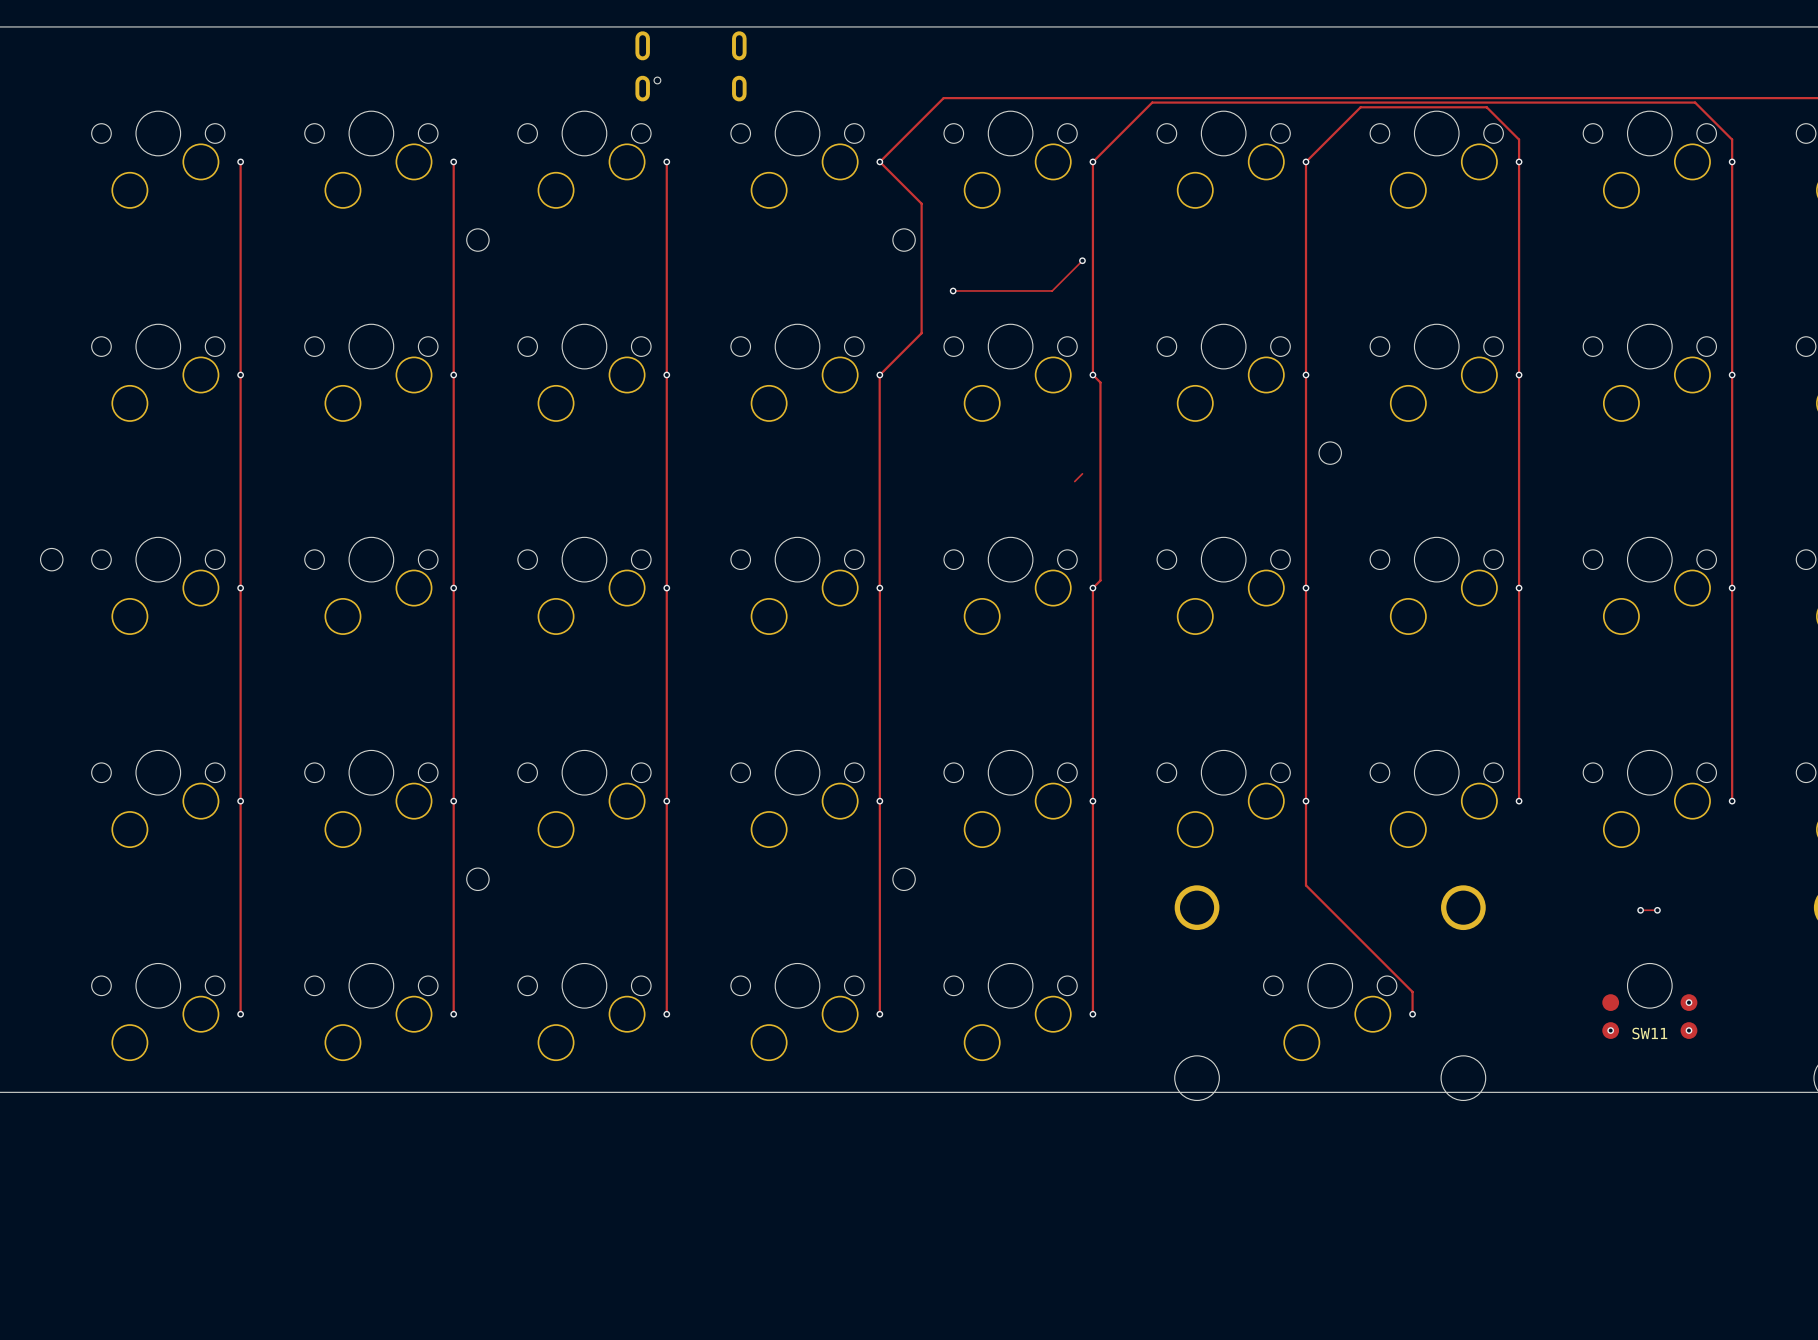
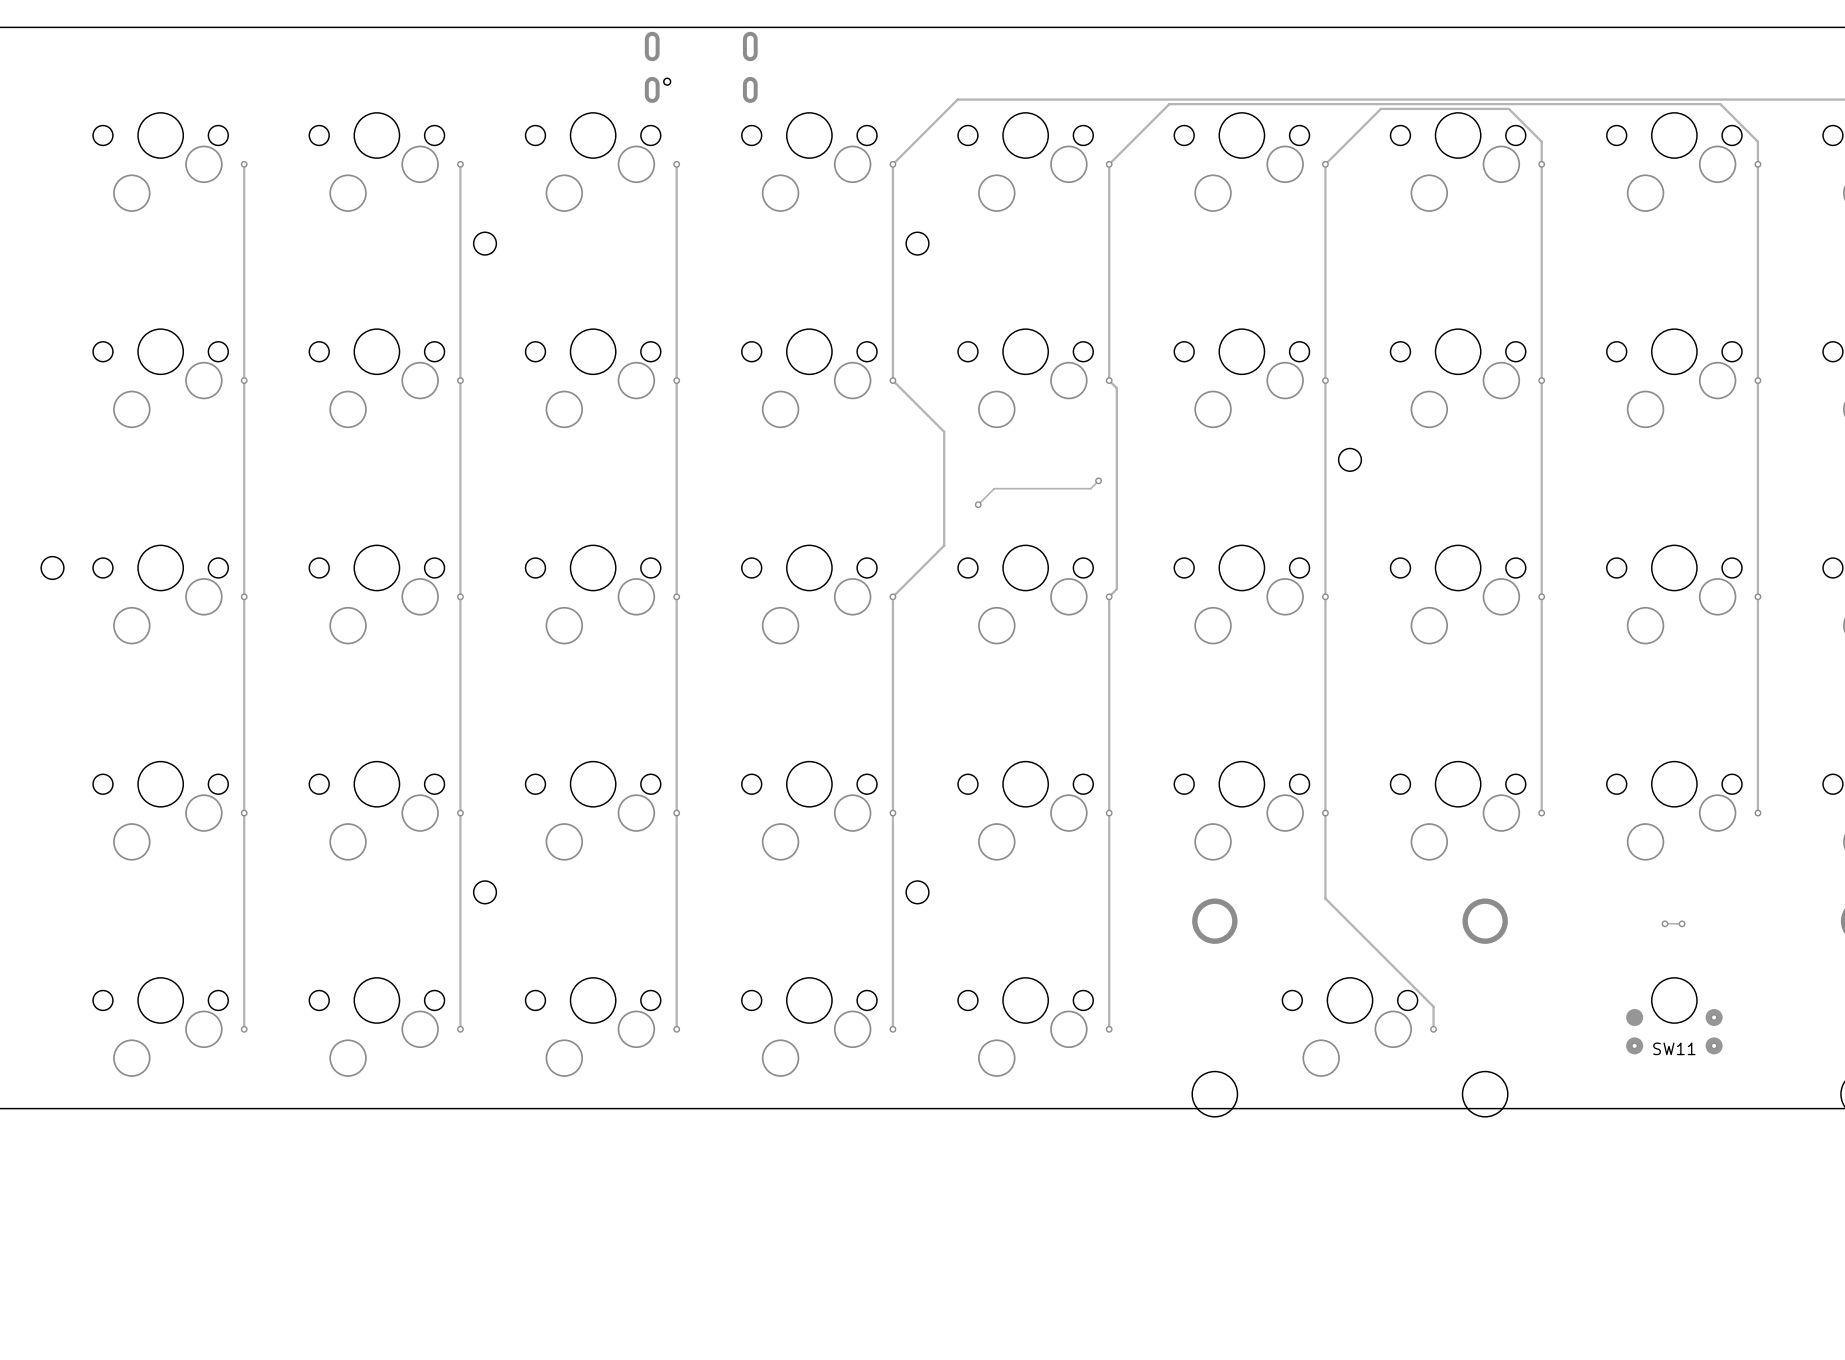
track: (879, 161) (921, 203) (921, 333) (879, 375) (879, 588) -> (892, 164) (892, 380) (944, 431) (944, 545) (892, 596)
track: (1082, 260) (1052, 290) (953, 290) -> none
via: (1082, 260) -> none
via: (953, 290) -> none
via: none -> (1098, 480)
track: none -> (1090, 488) (994, 488) (978, 504)
via: none -> (978, 504)

